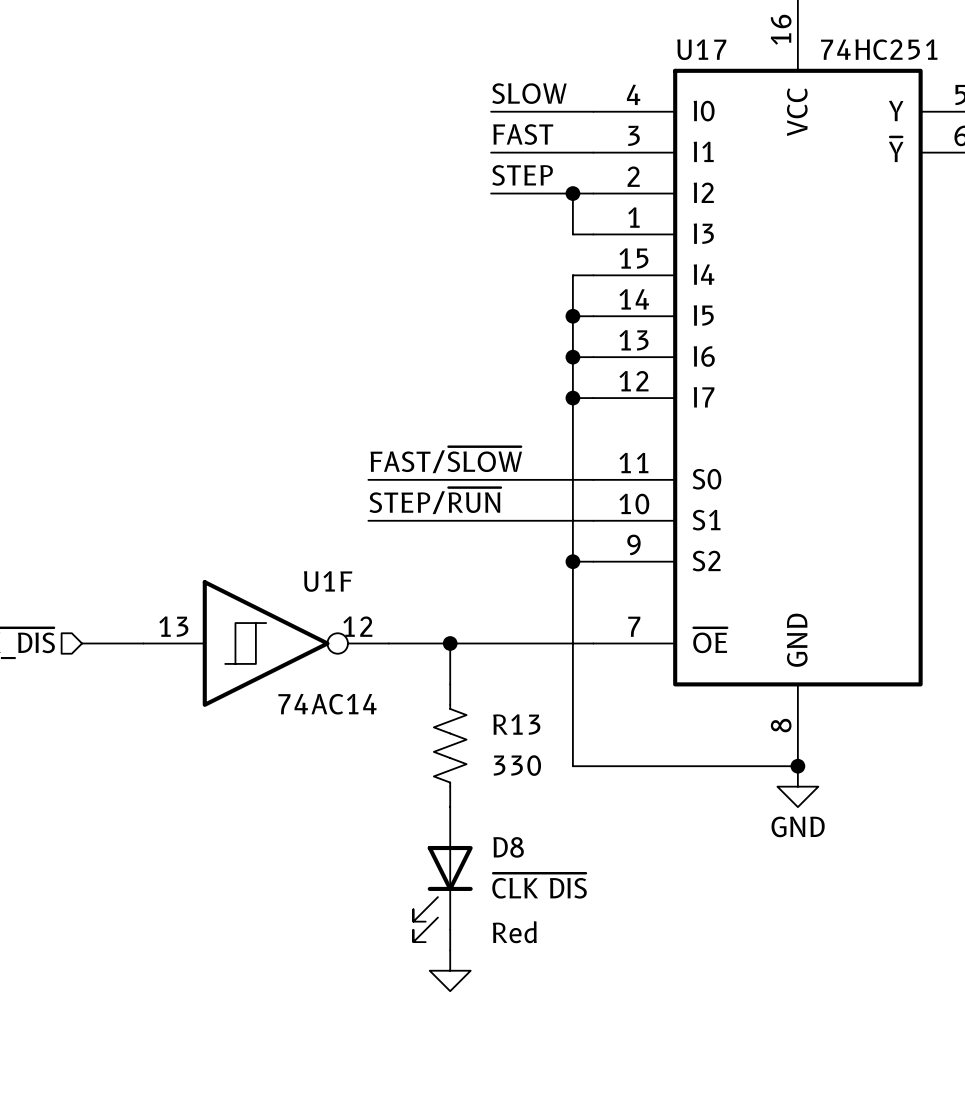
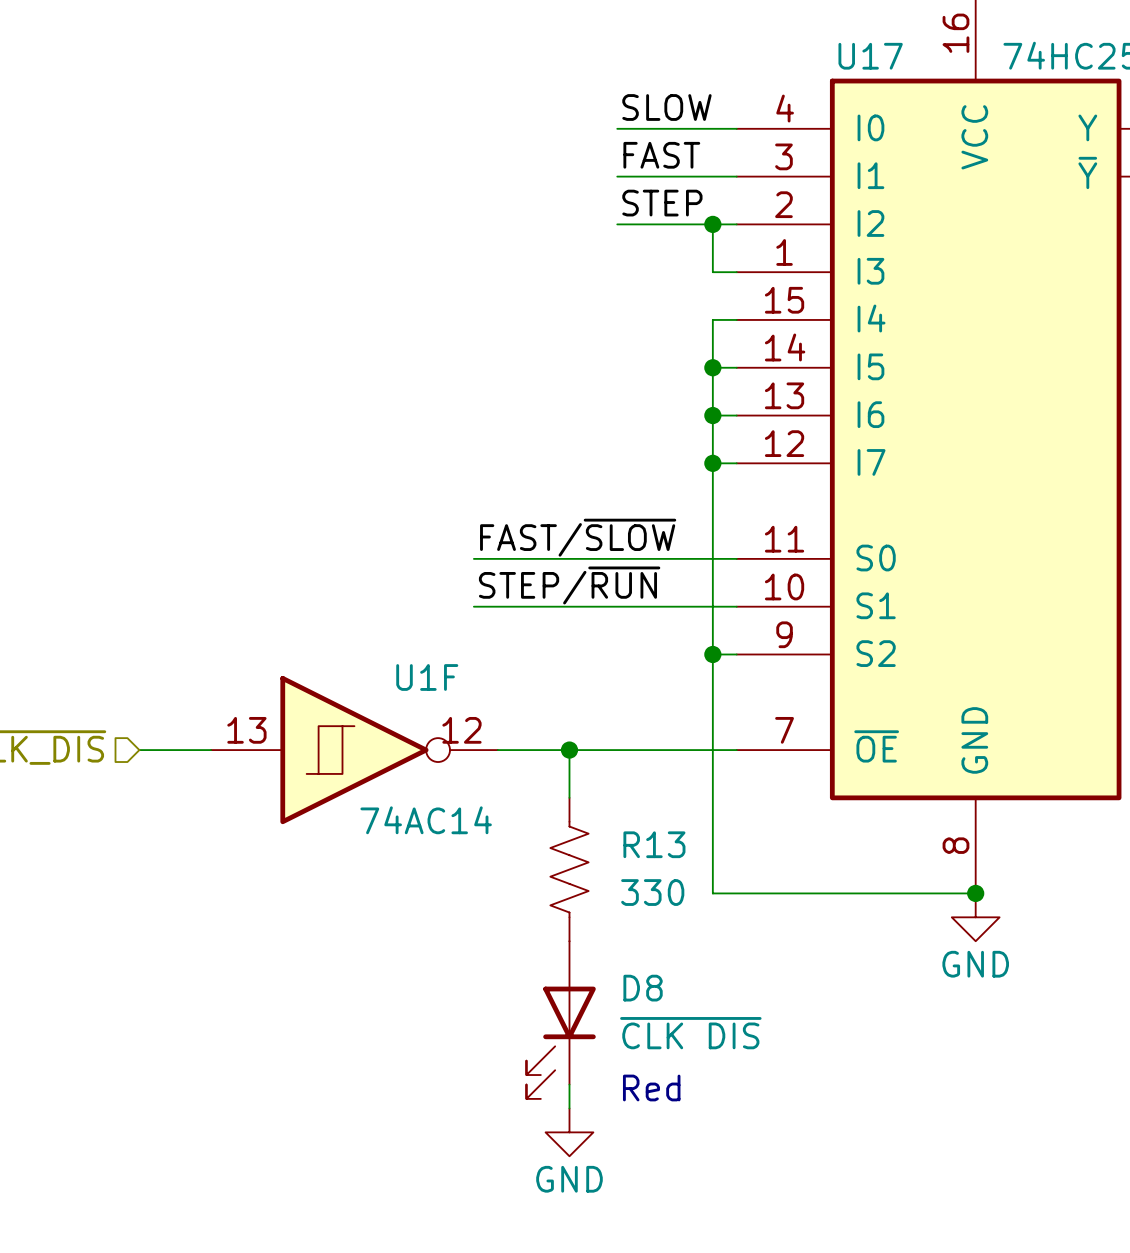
power symbol text: none -> GND (569, 1179)

